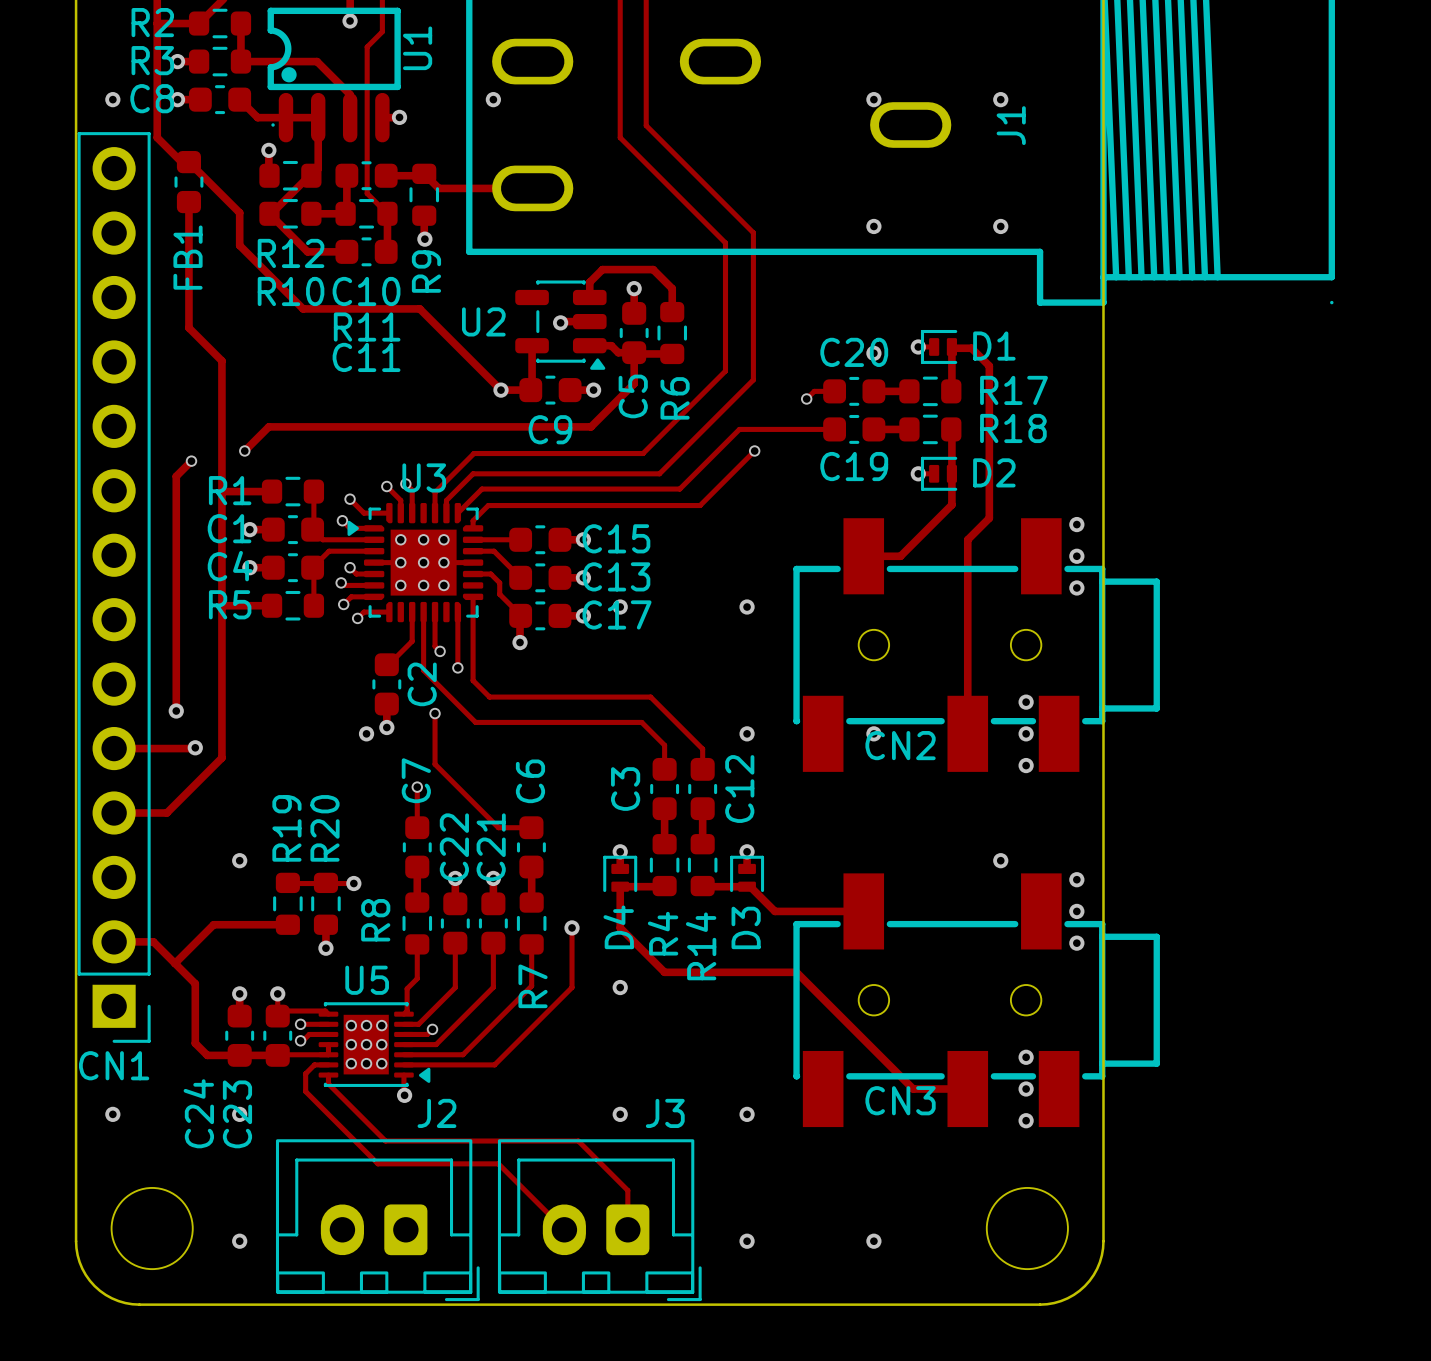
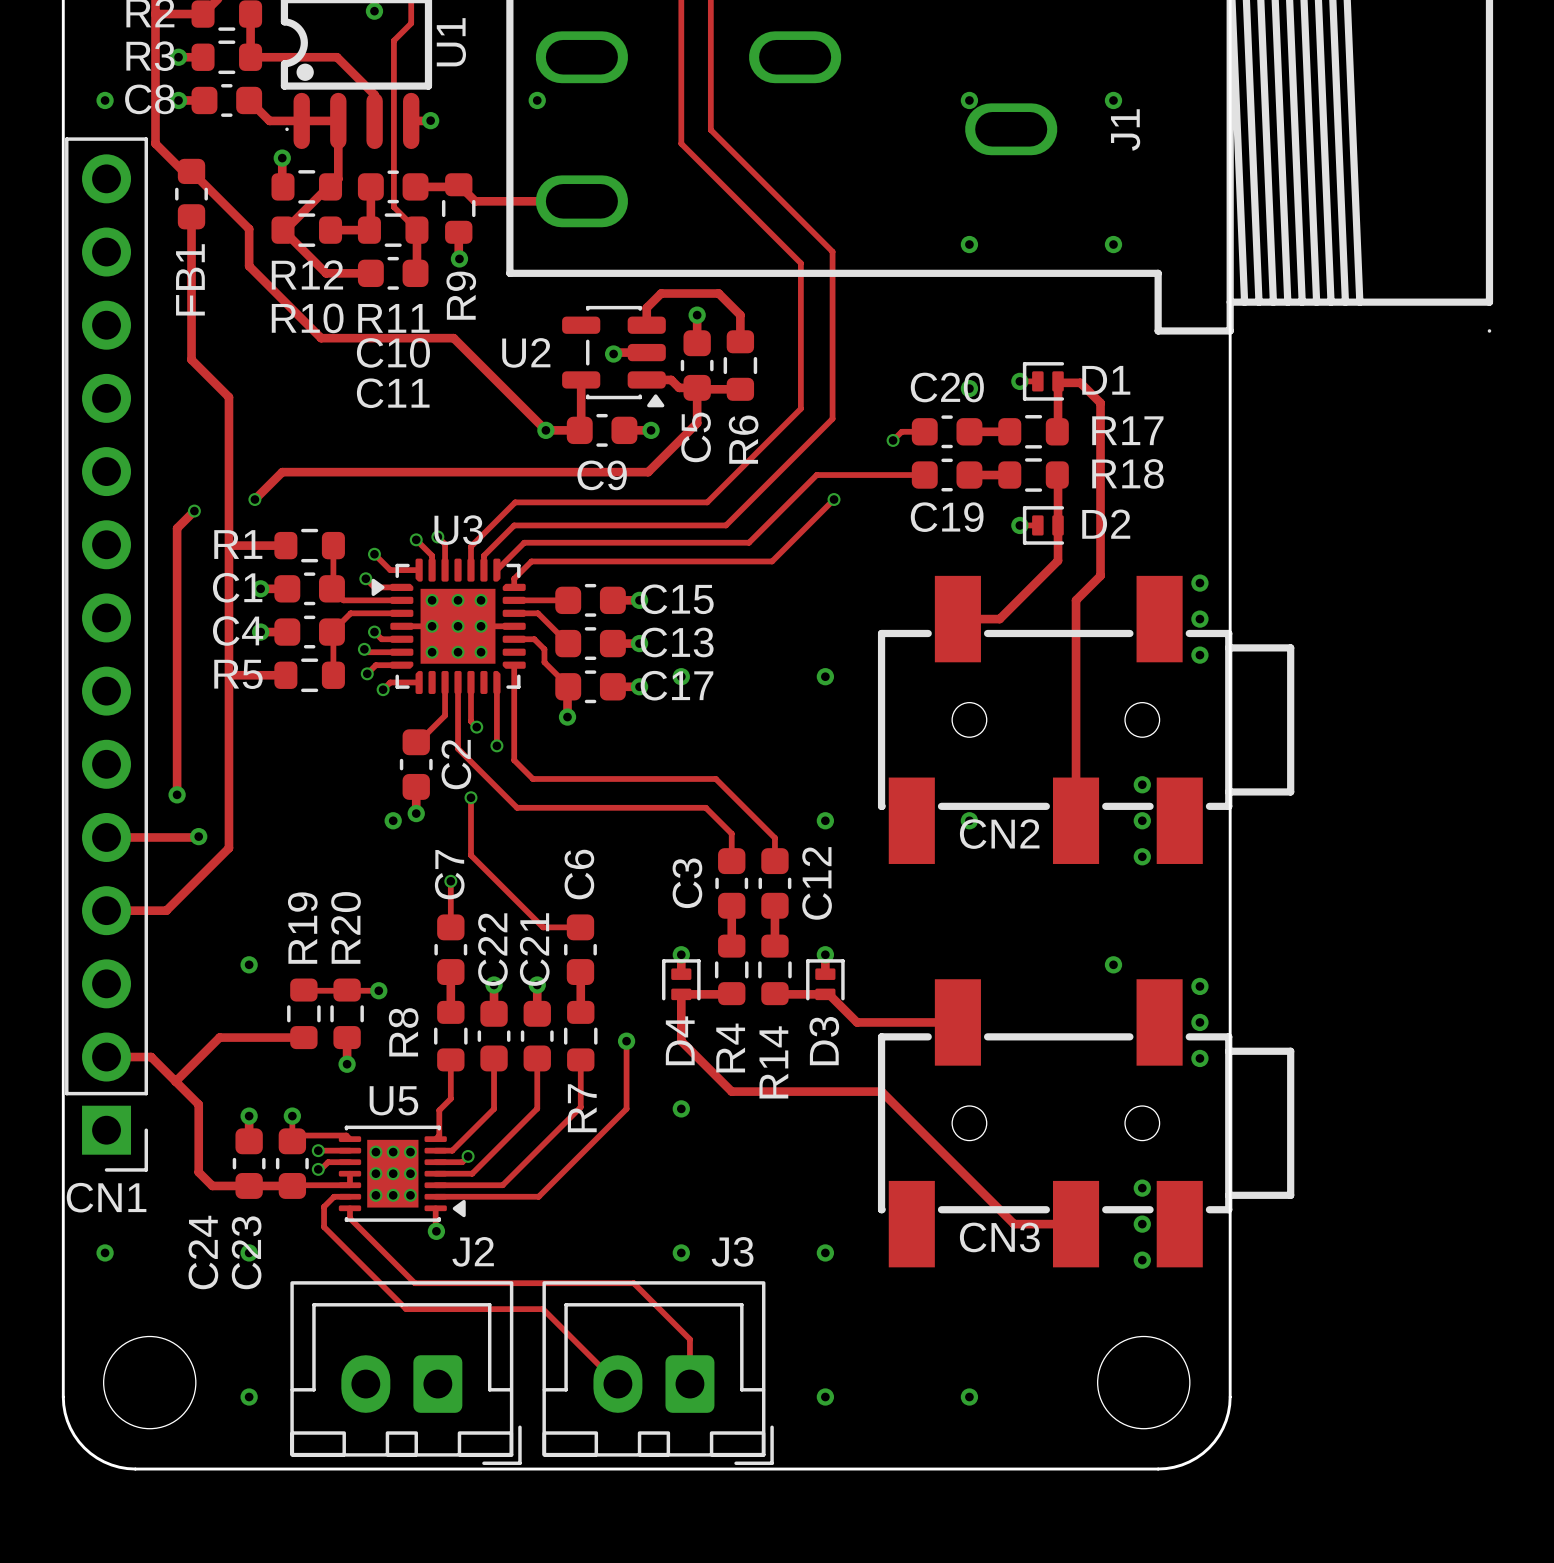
C10 name position: C10 (366, 291) -> C10 (393, 352)
R11 name position: R11 (367, 327) -> R11 (393, 318)

